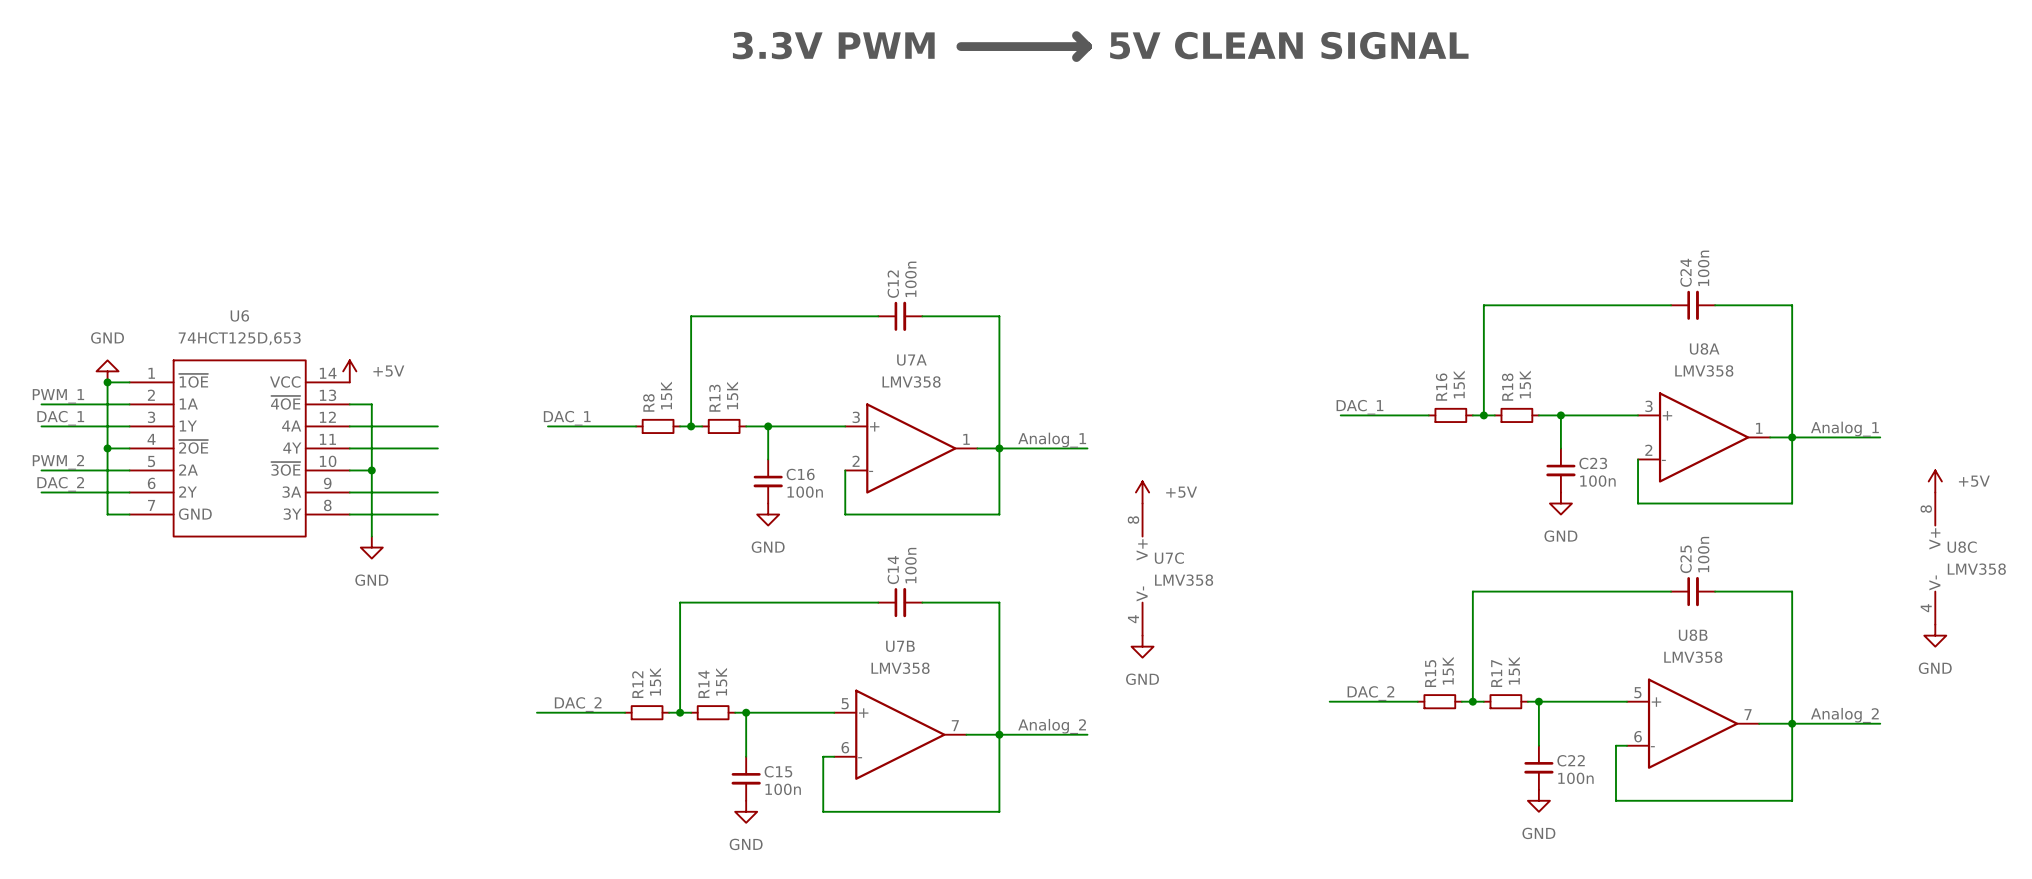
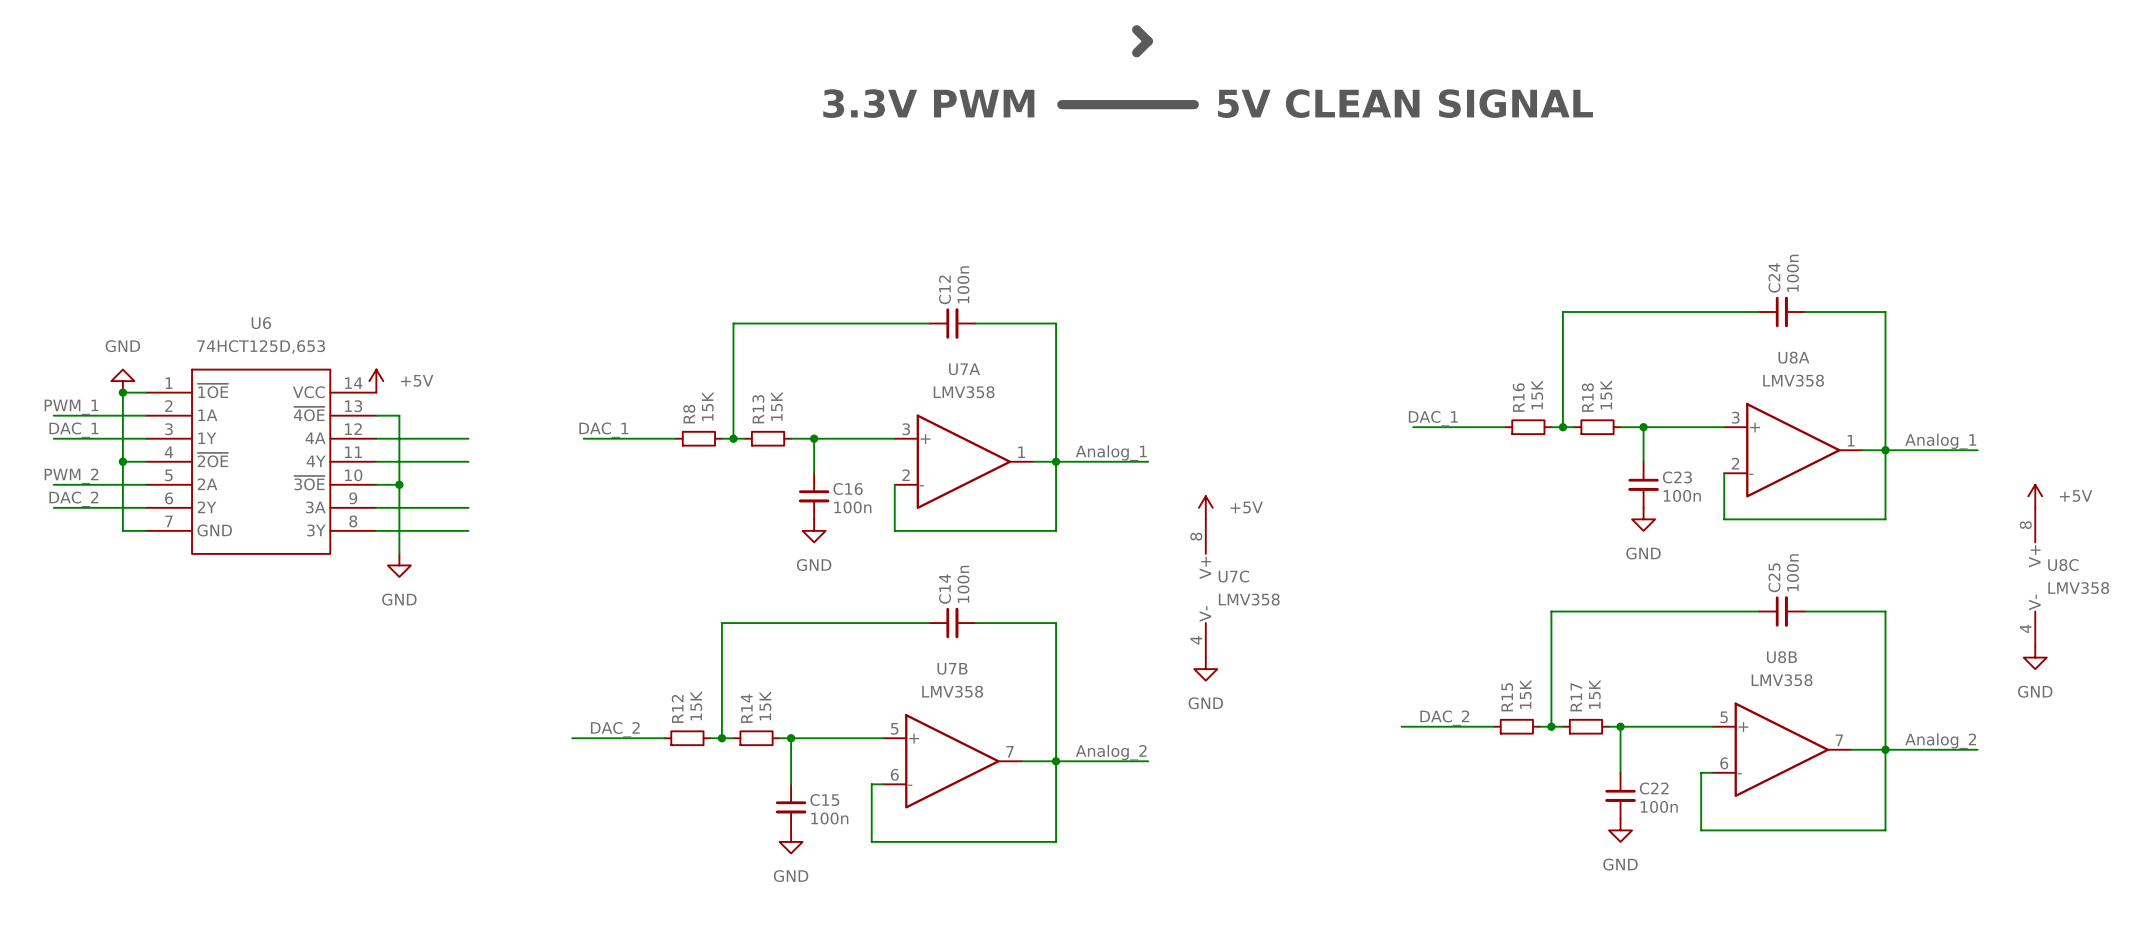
text position: 3.3V PWM (833, 45) -> 3.3V PWM (928, 103)
text position: 5V CLEAN SIGNAL (1289, 45) -> 5V CLEAN SIGNAL (1405, 103)
line: (960, 46) (1087, 46) -> (1061, 104) (1194, 104)

